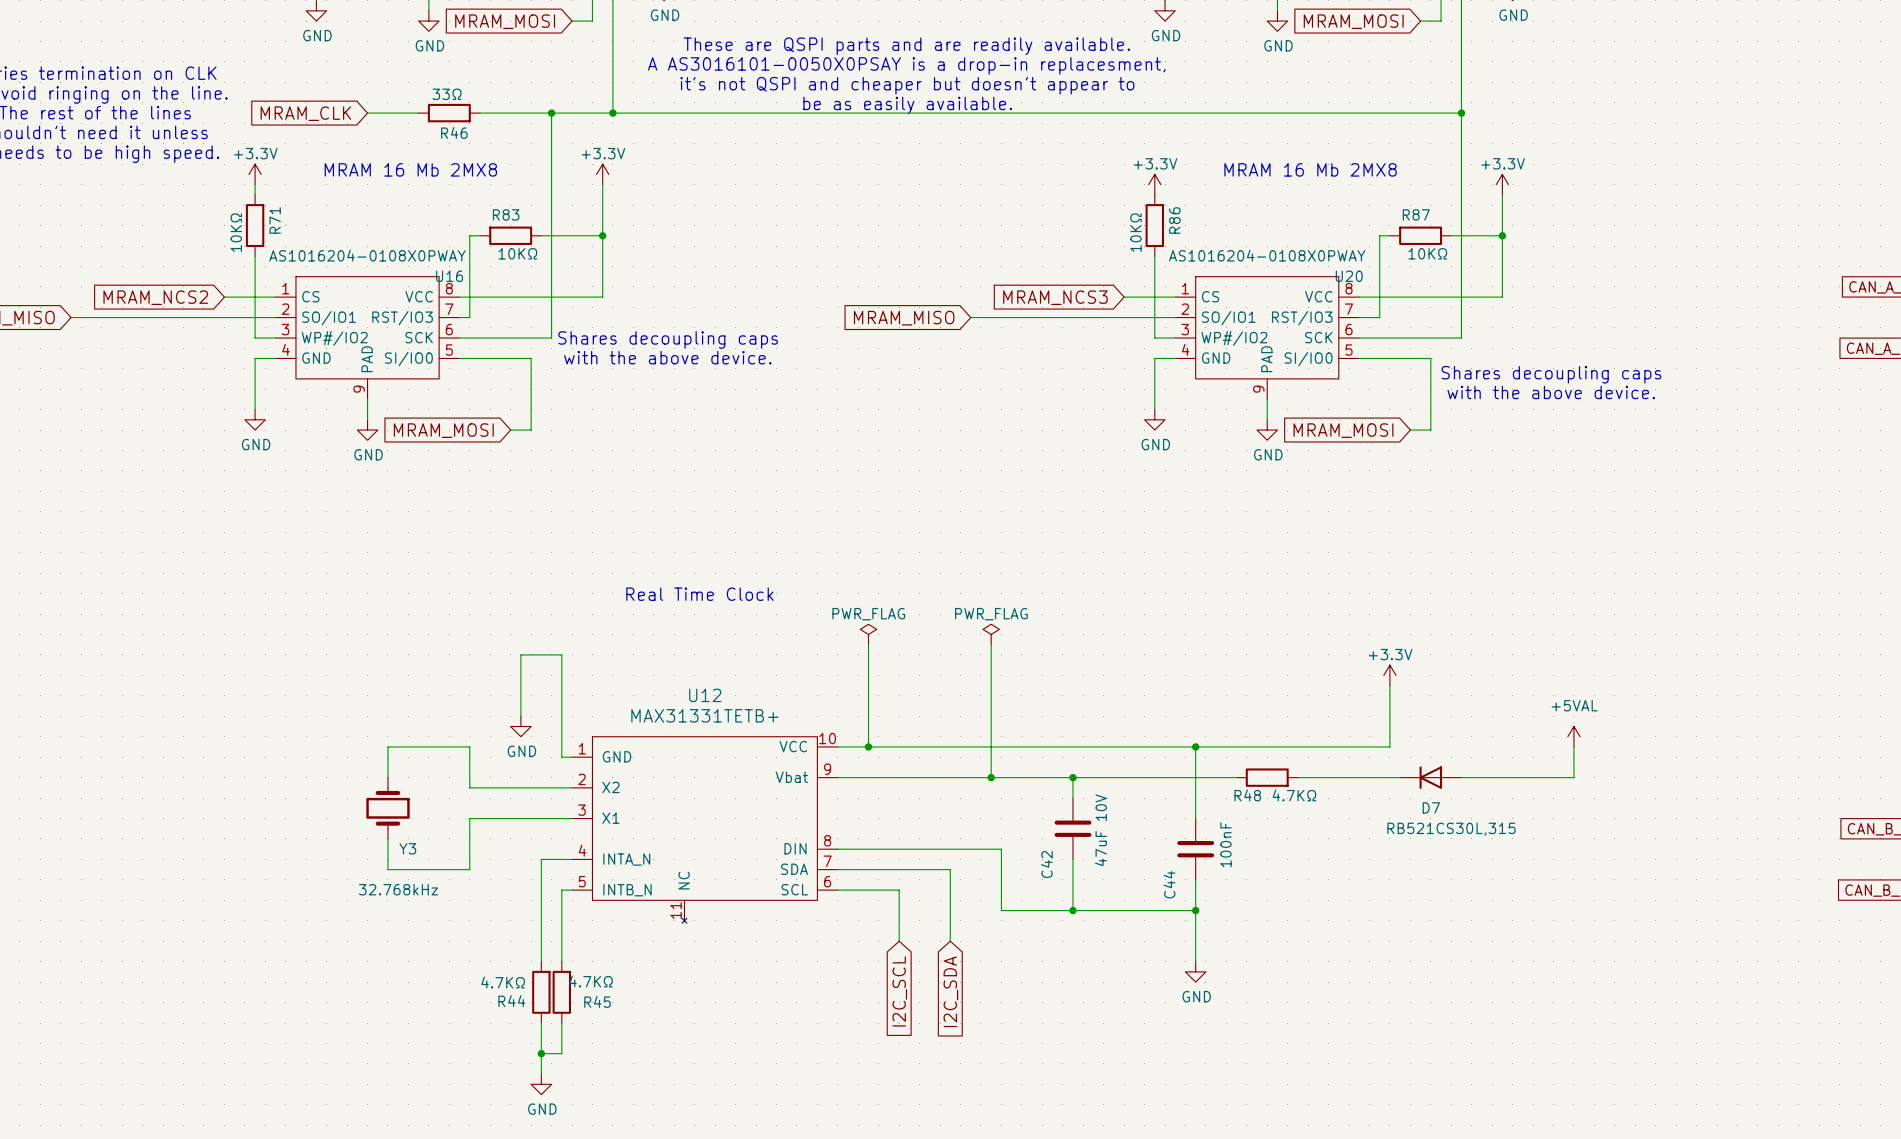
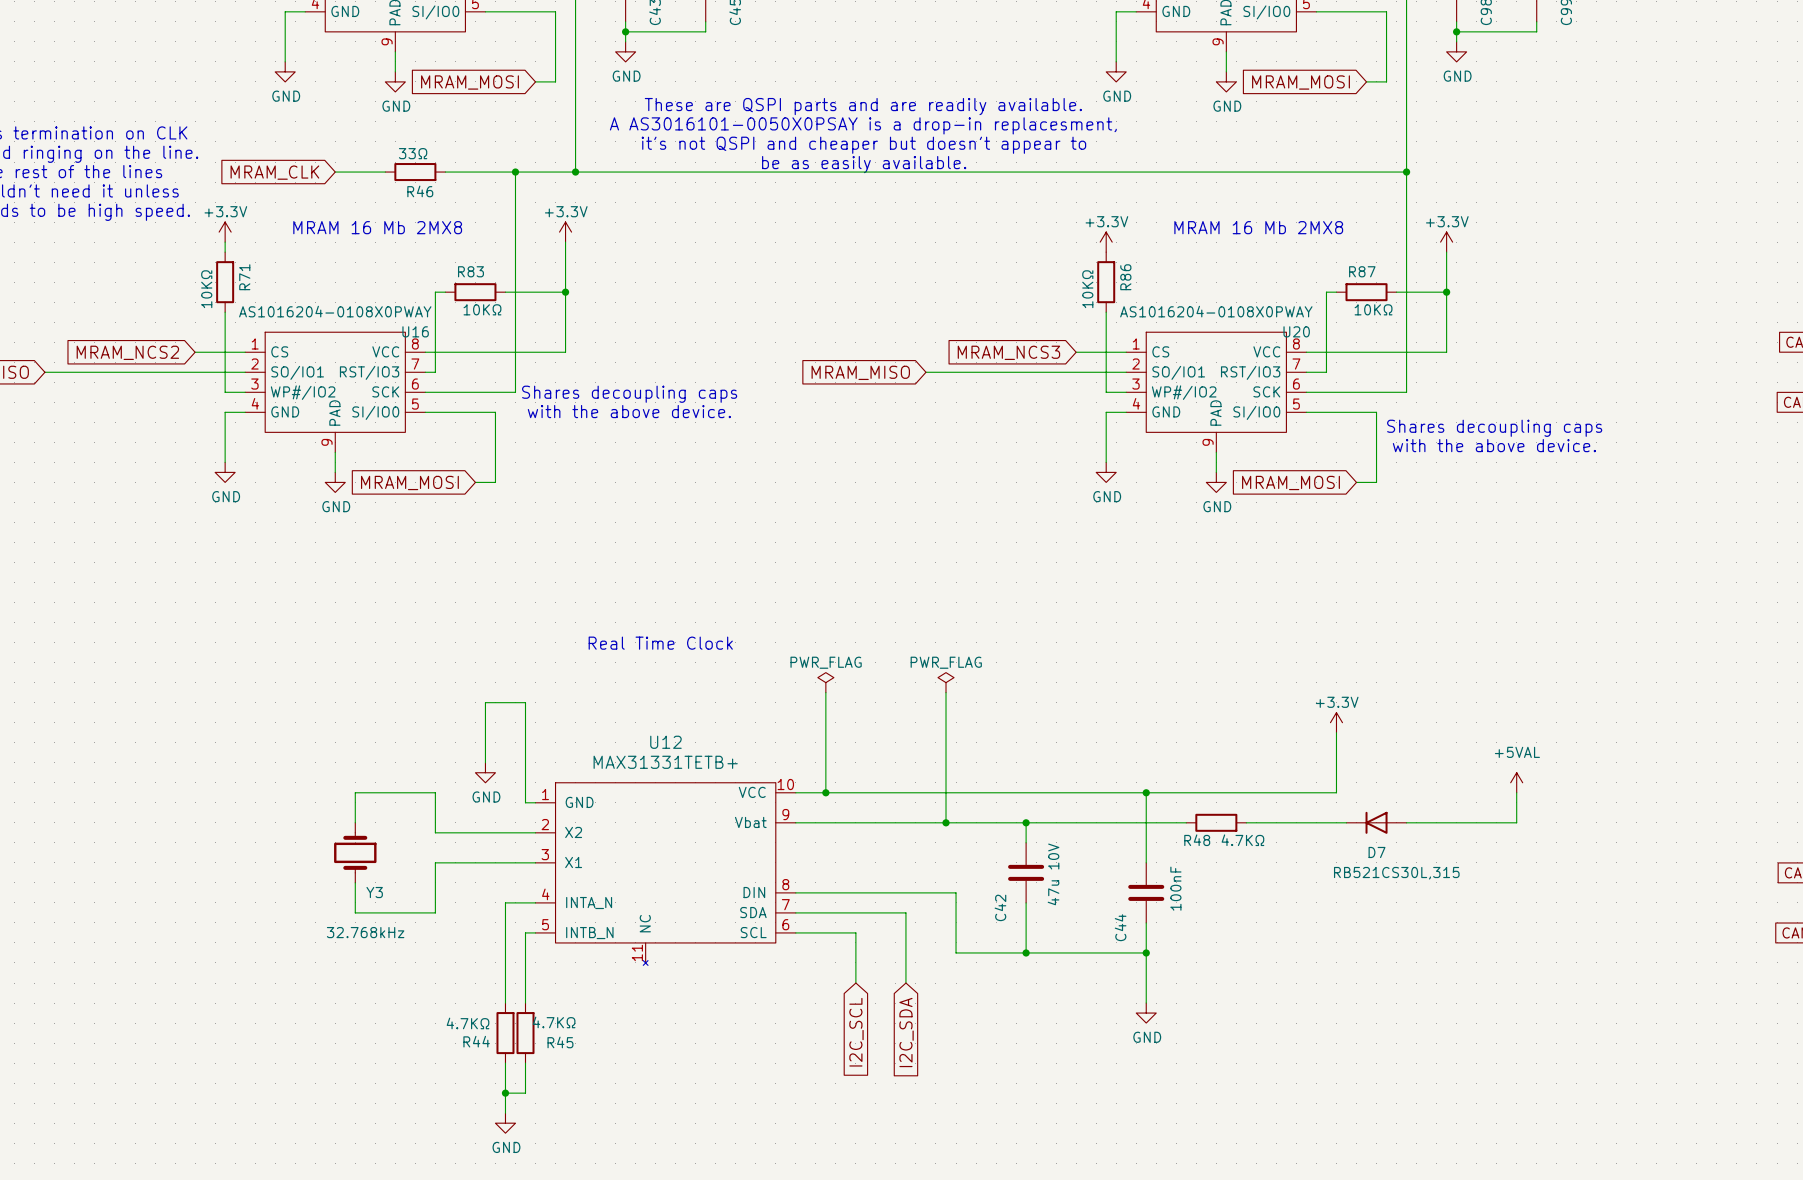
C42 value: 47uF 10V (1100, 830) -> 47u 10V (1053, 874)

